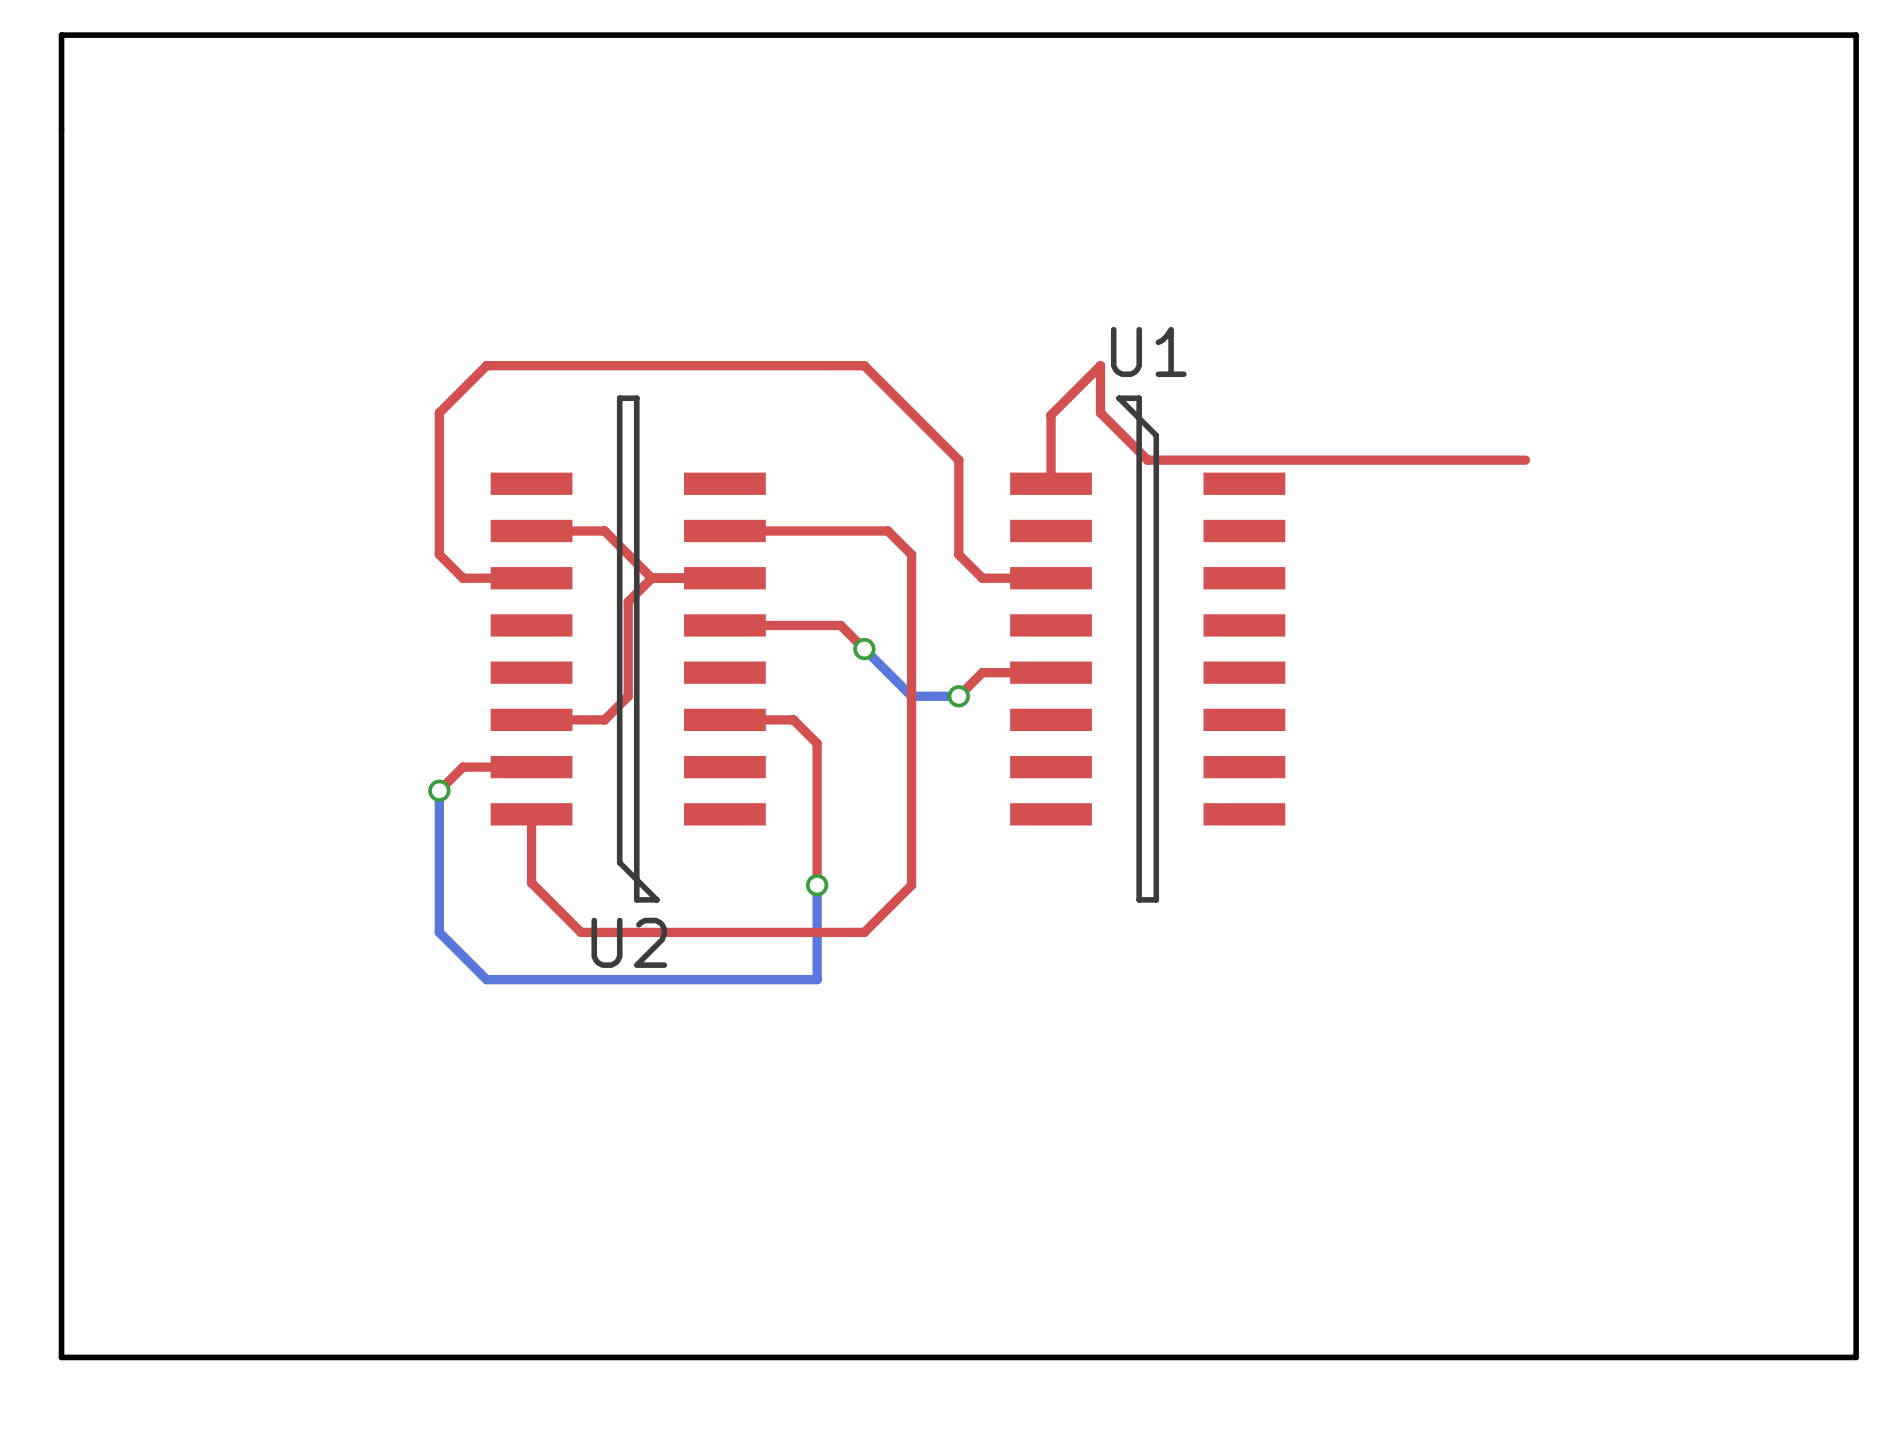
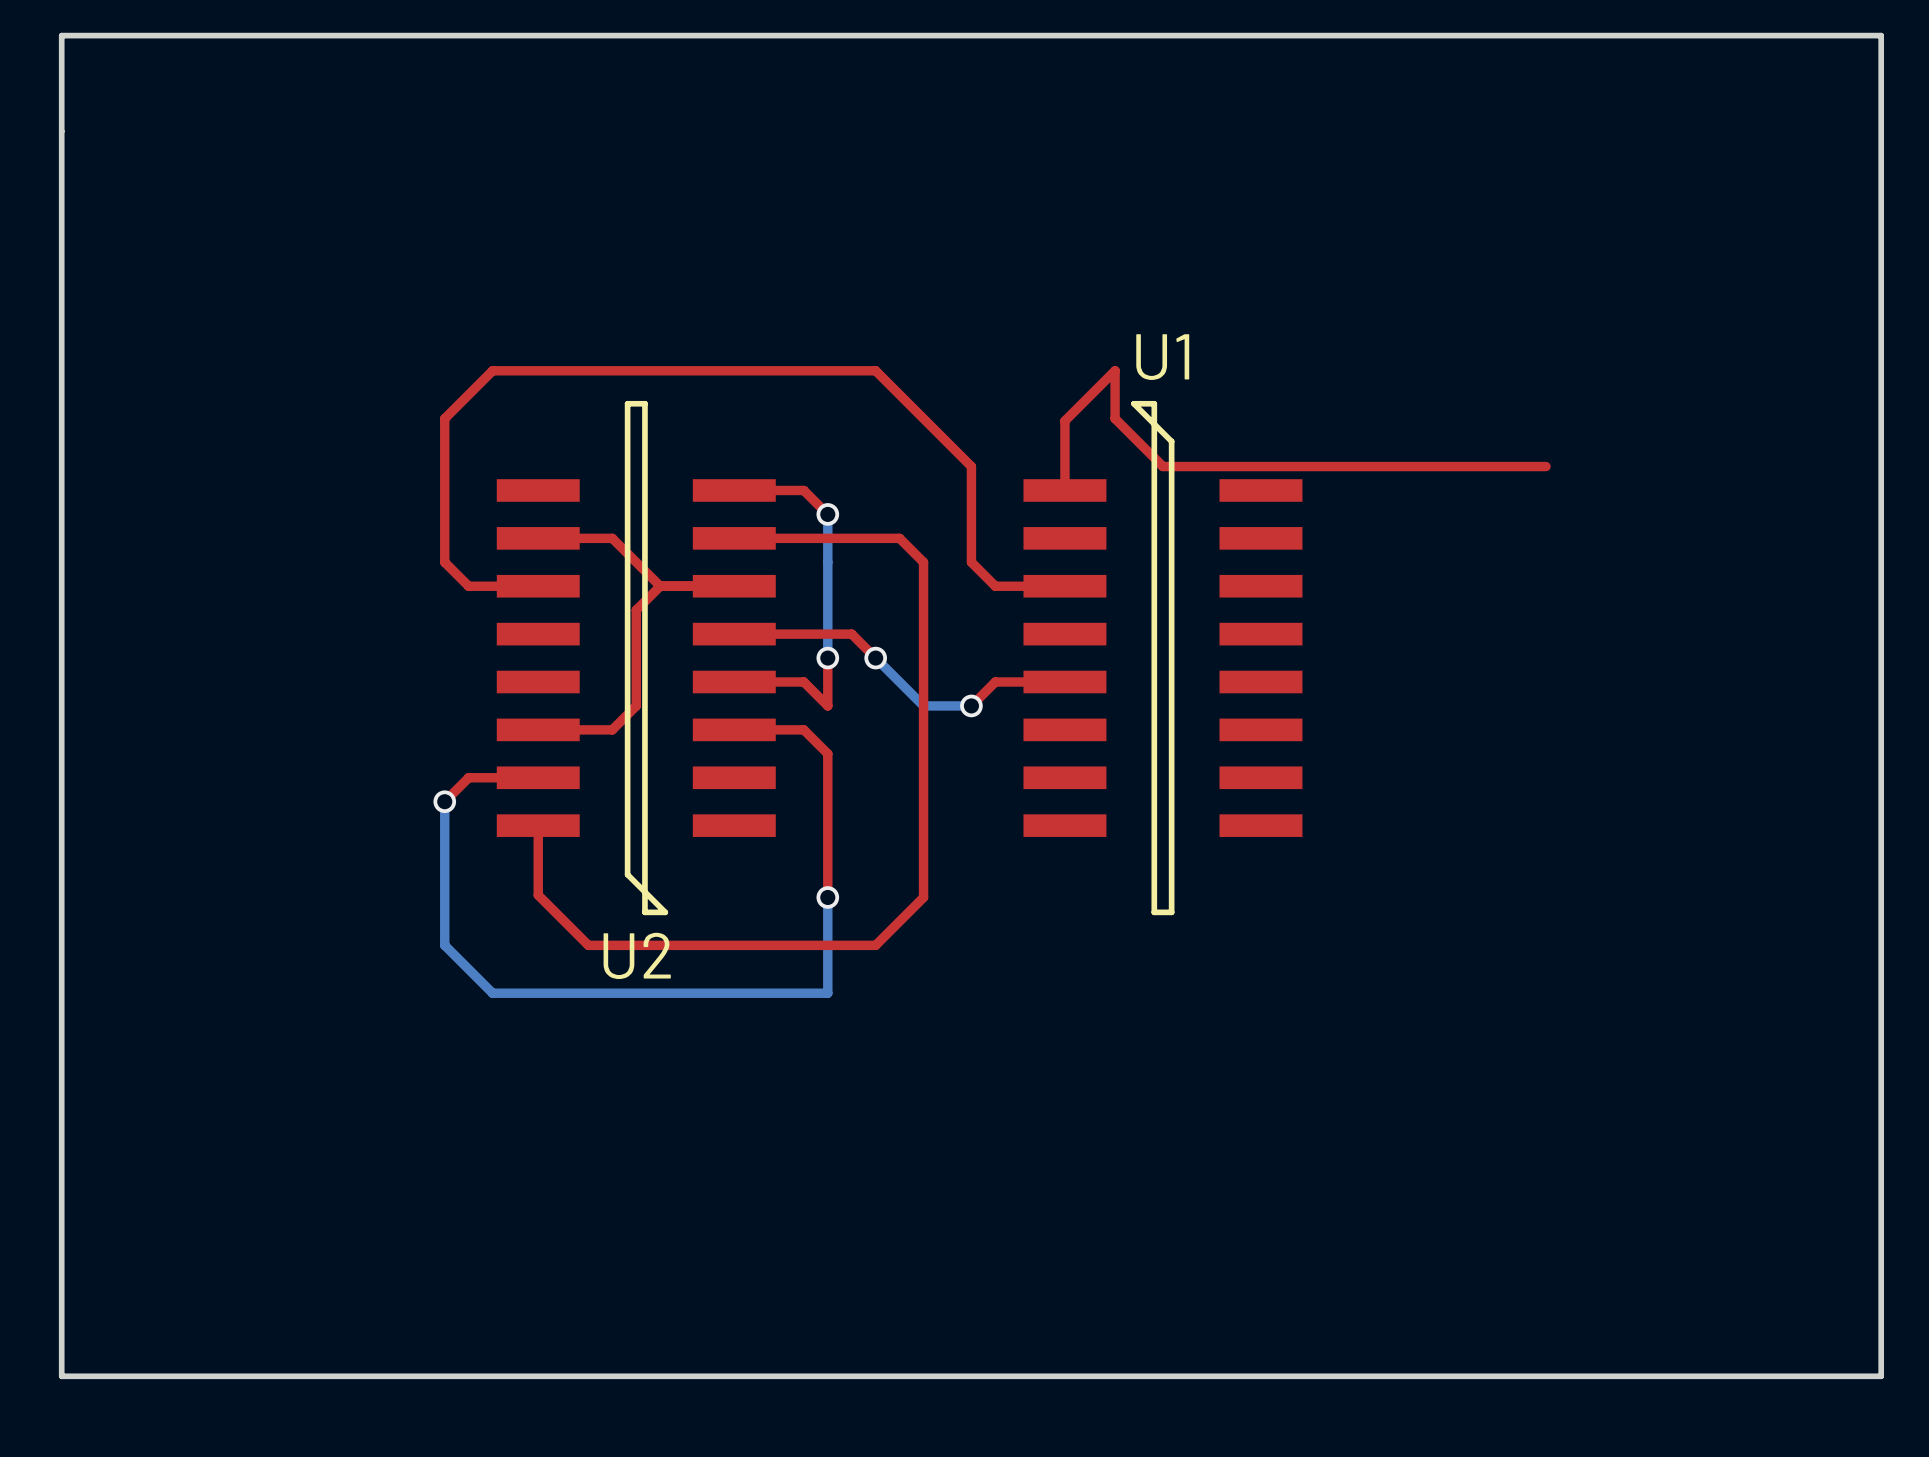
top track: none -> (734, 490) (803, 490) (827, 514)
bottom track: none -> (827, 514) (827, 658)
via: none -> (827, 514)
top track: none -> (827, 658) (827, 705) (803, 682) (734, 682)
via: none -> (827, 658)

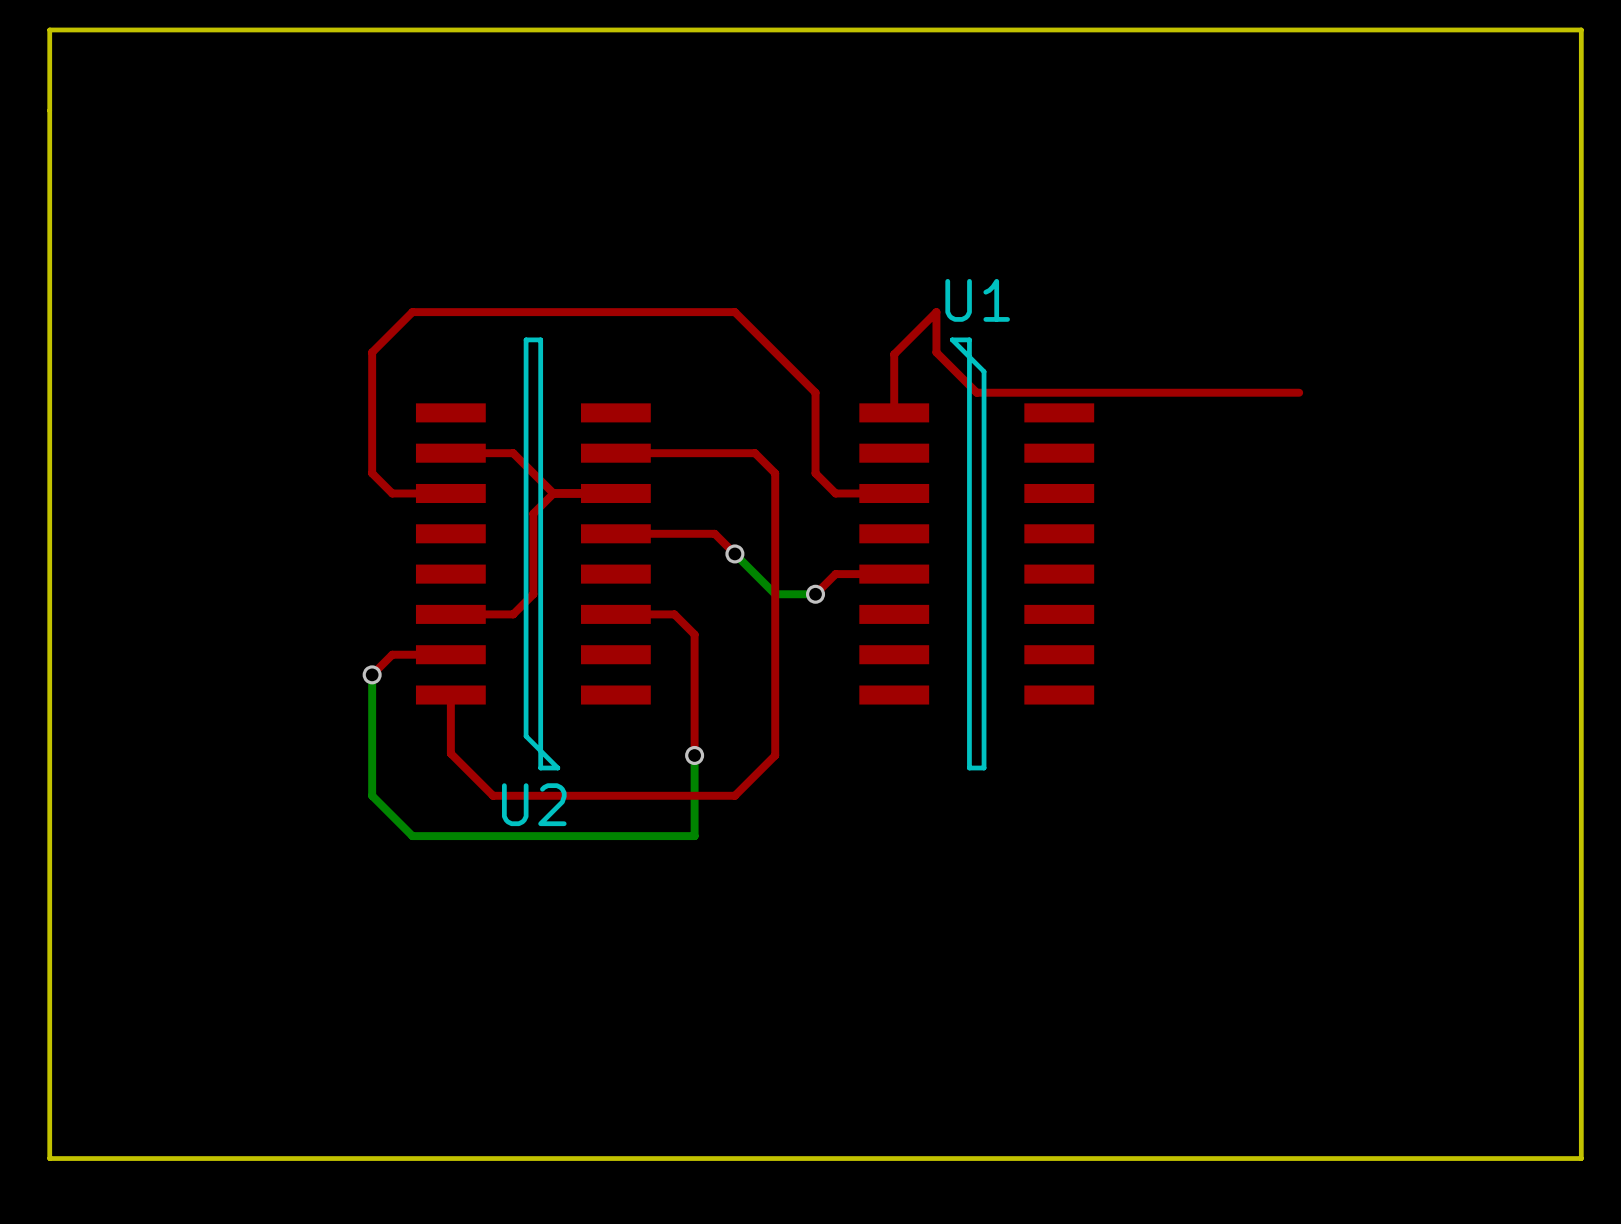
top track: (734, 490) (803, 490) (827, 514) -> none
bottom track: (827, 514) (827, 658) -> none
via: (827, 514) -> none
top track: (827, 658) (827, 705) (803, 682) (734, 682) -> none
via: (827, 658) -> none

